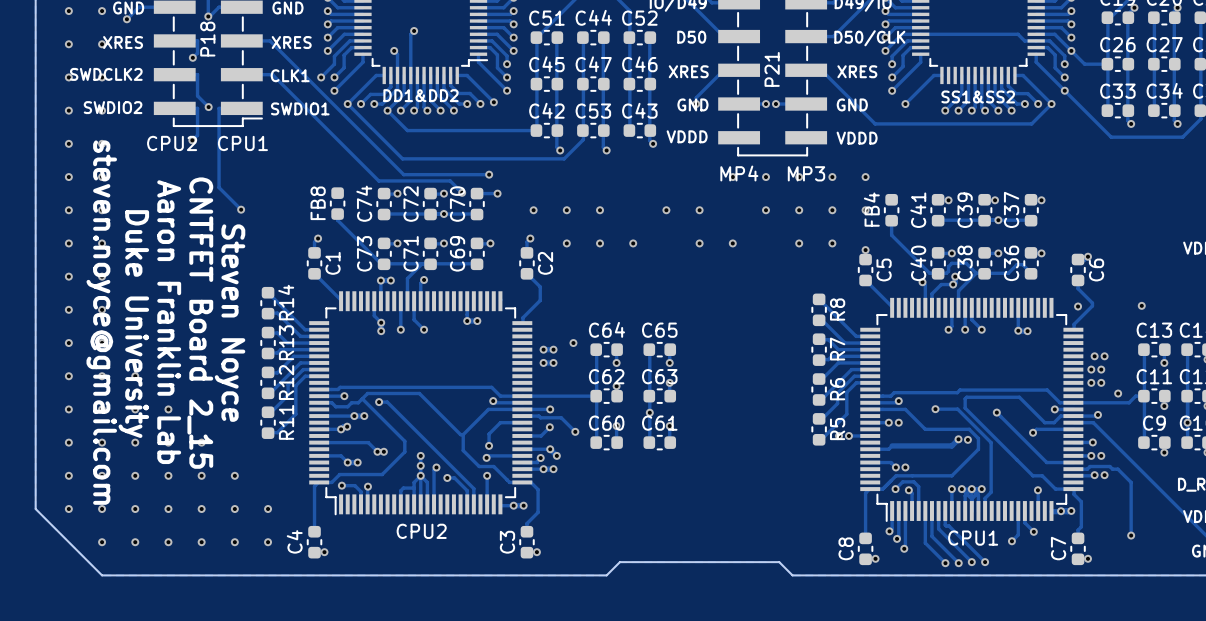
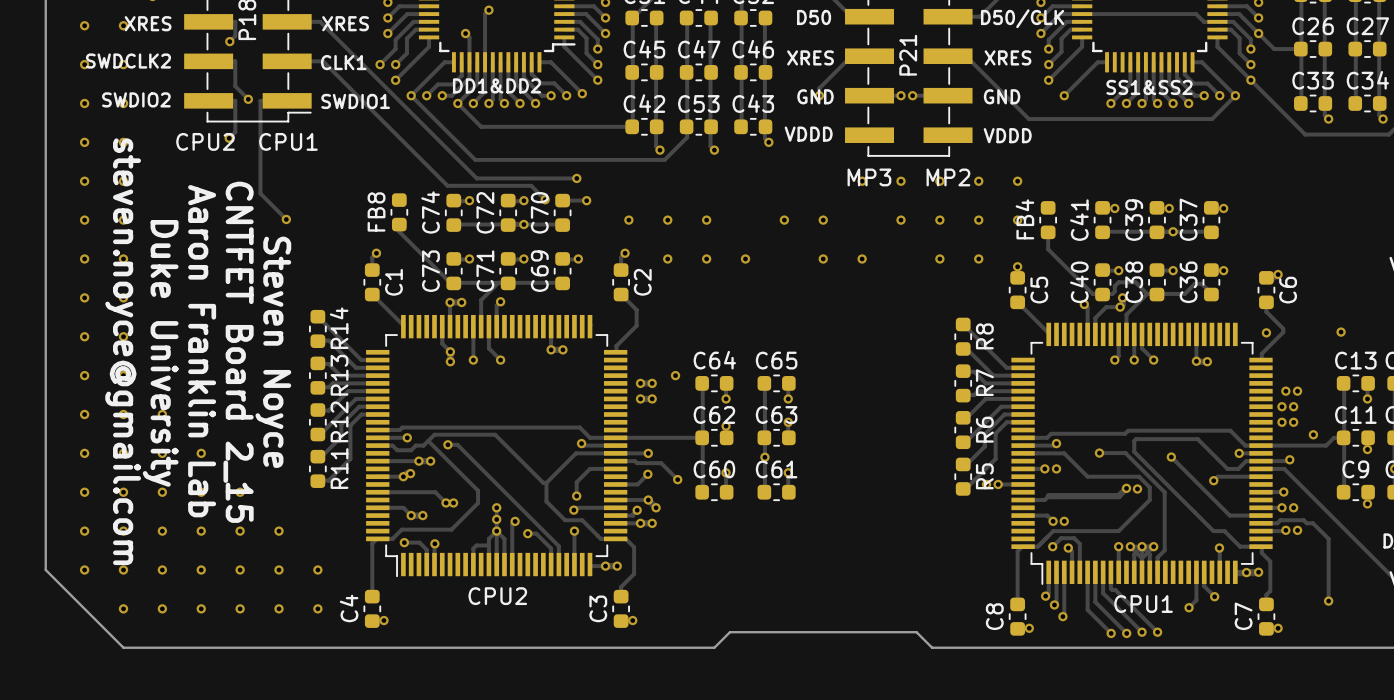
text: MP4 (739, 173) -> MP3 (869, 177)
text: MP3 (806, 173) -> MP2 (948, 177)

